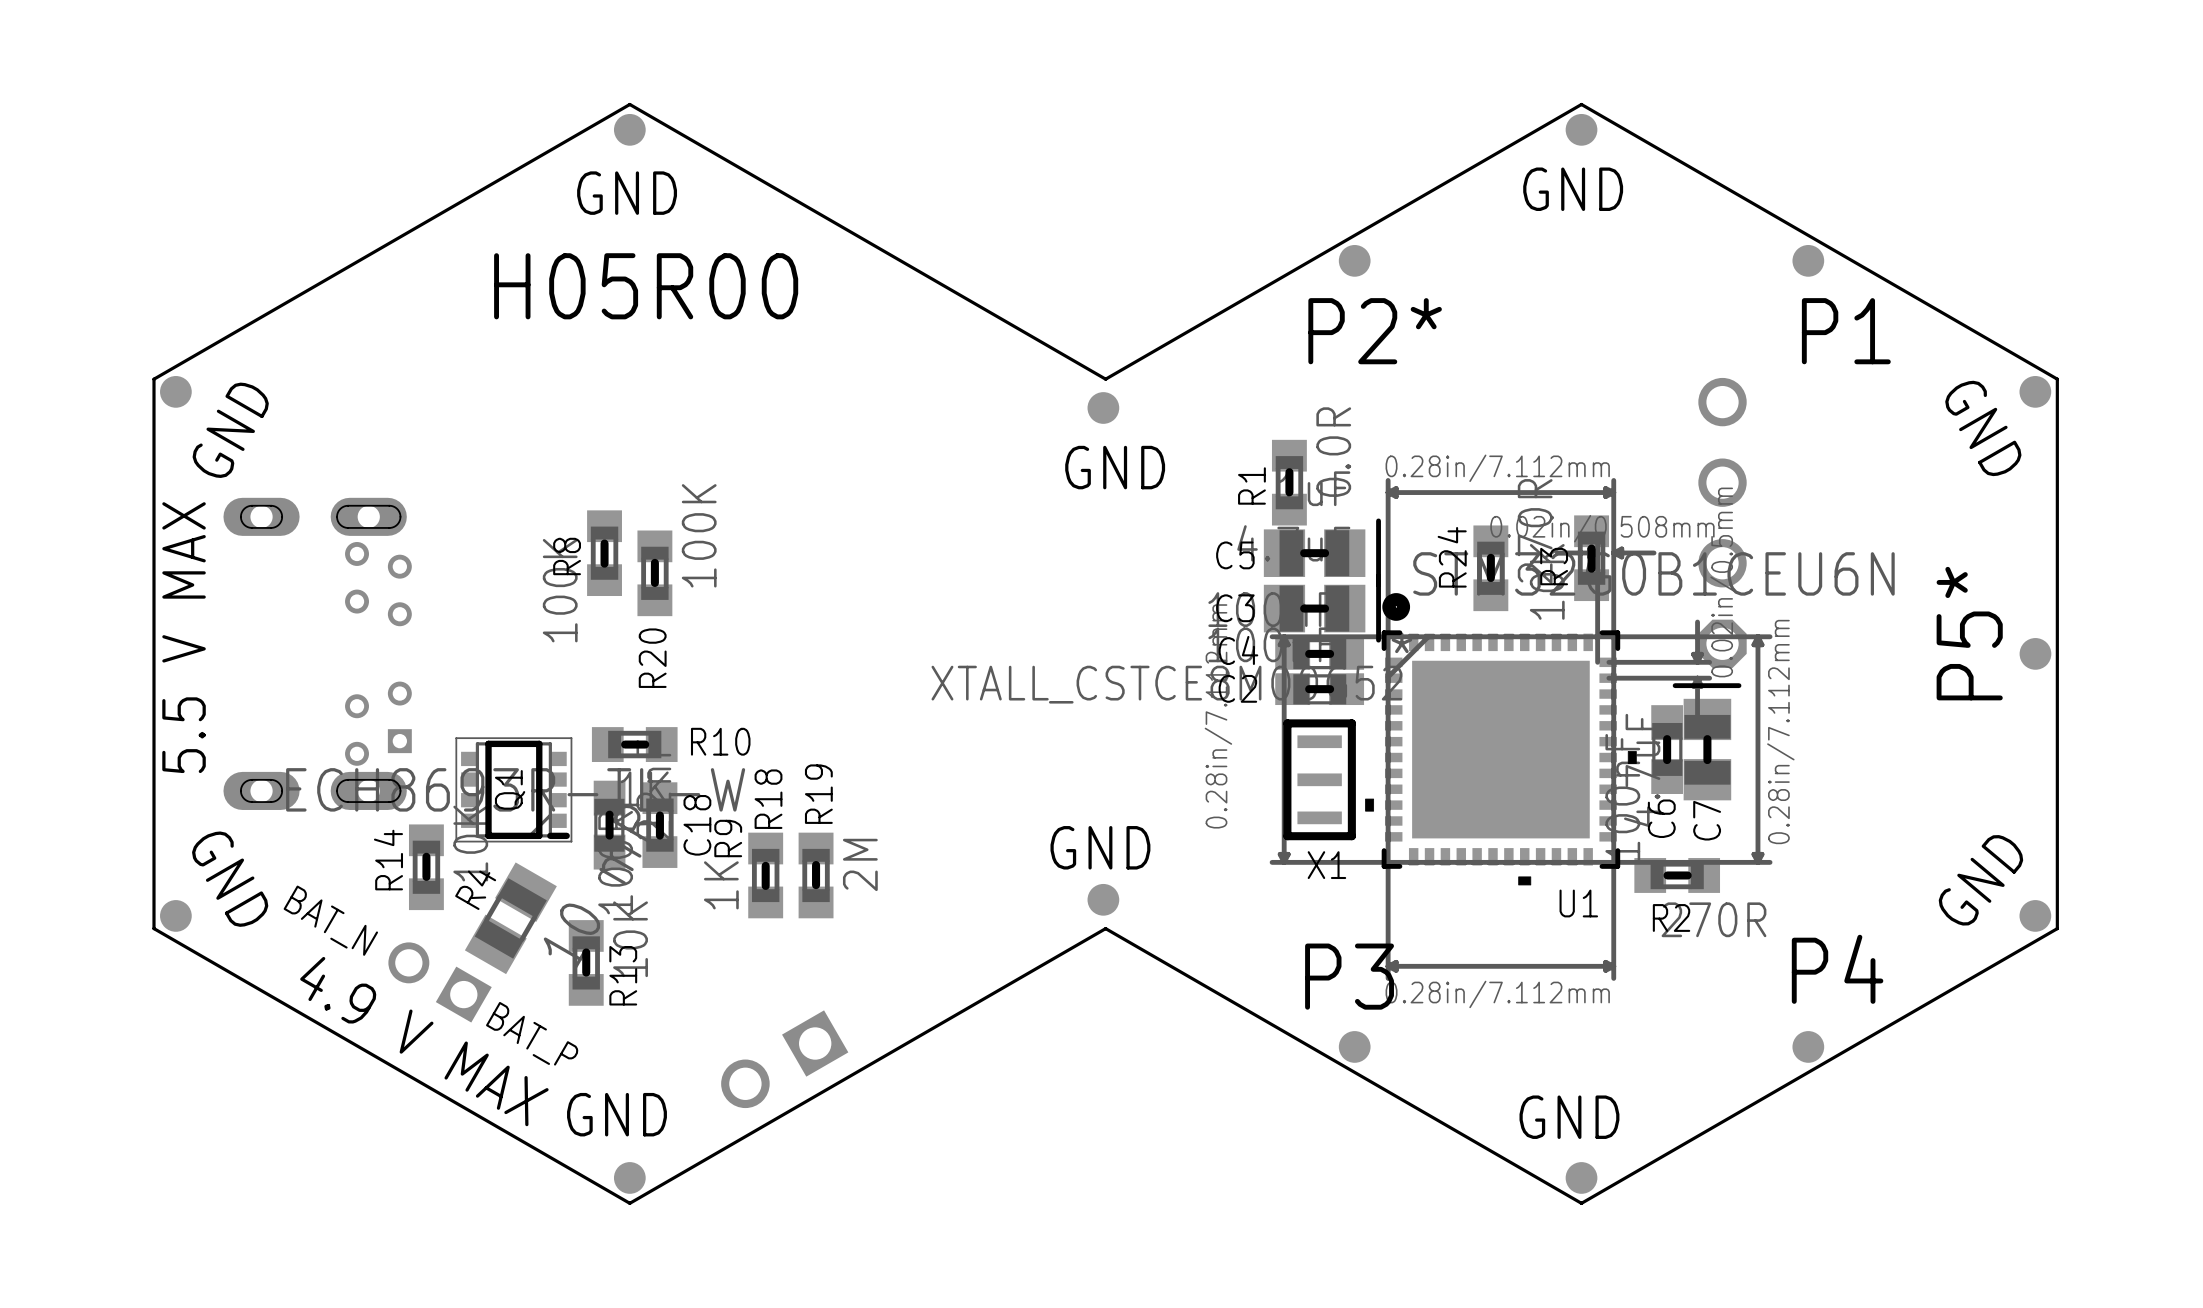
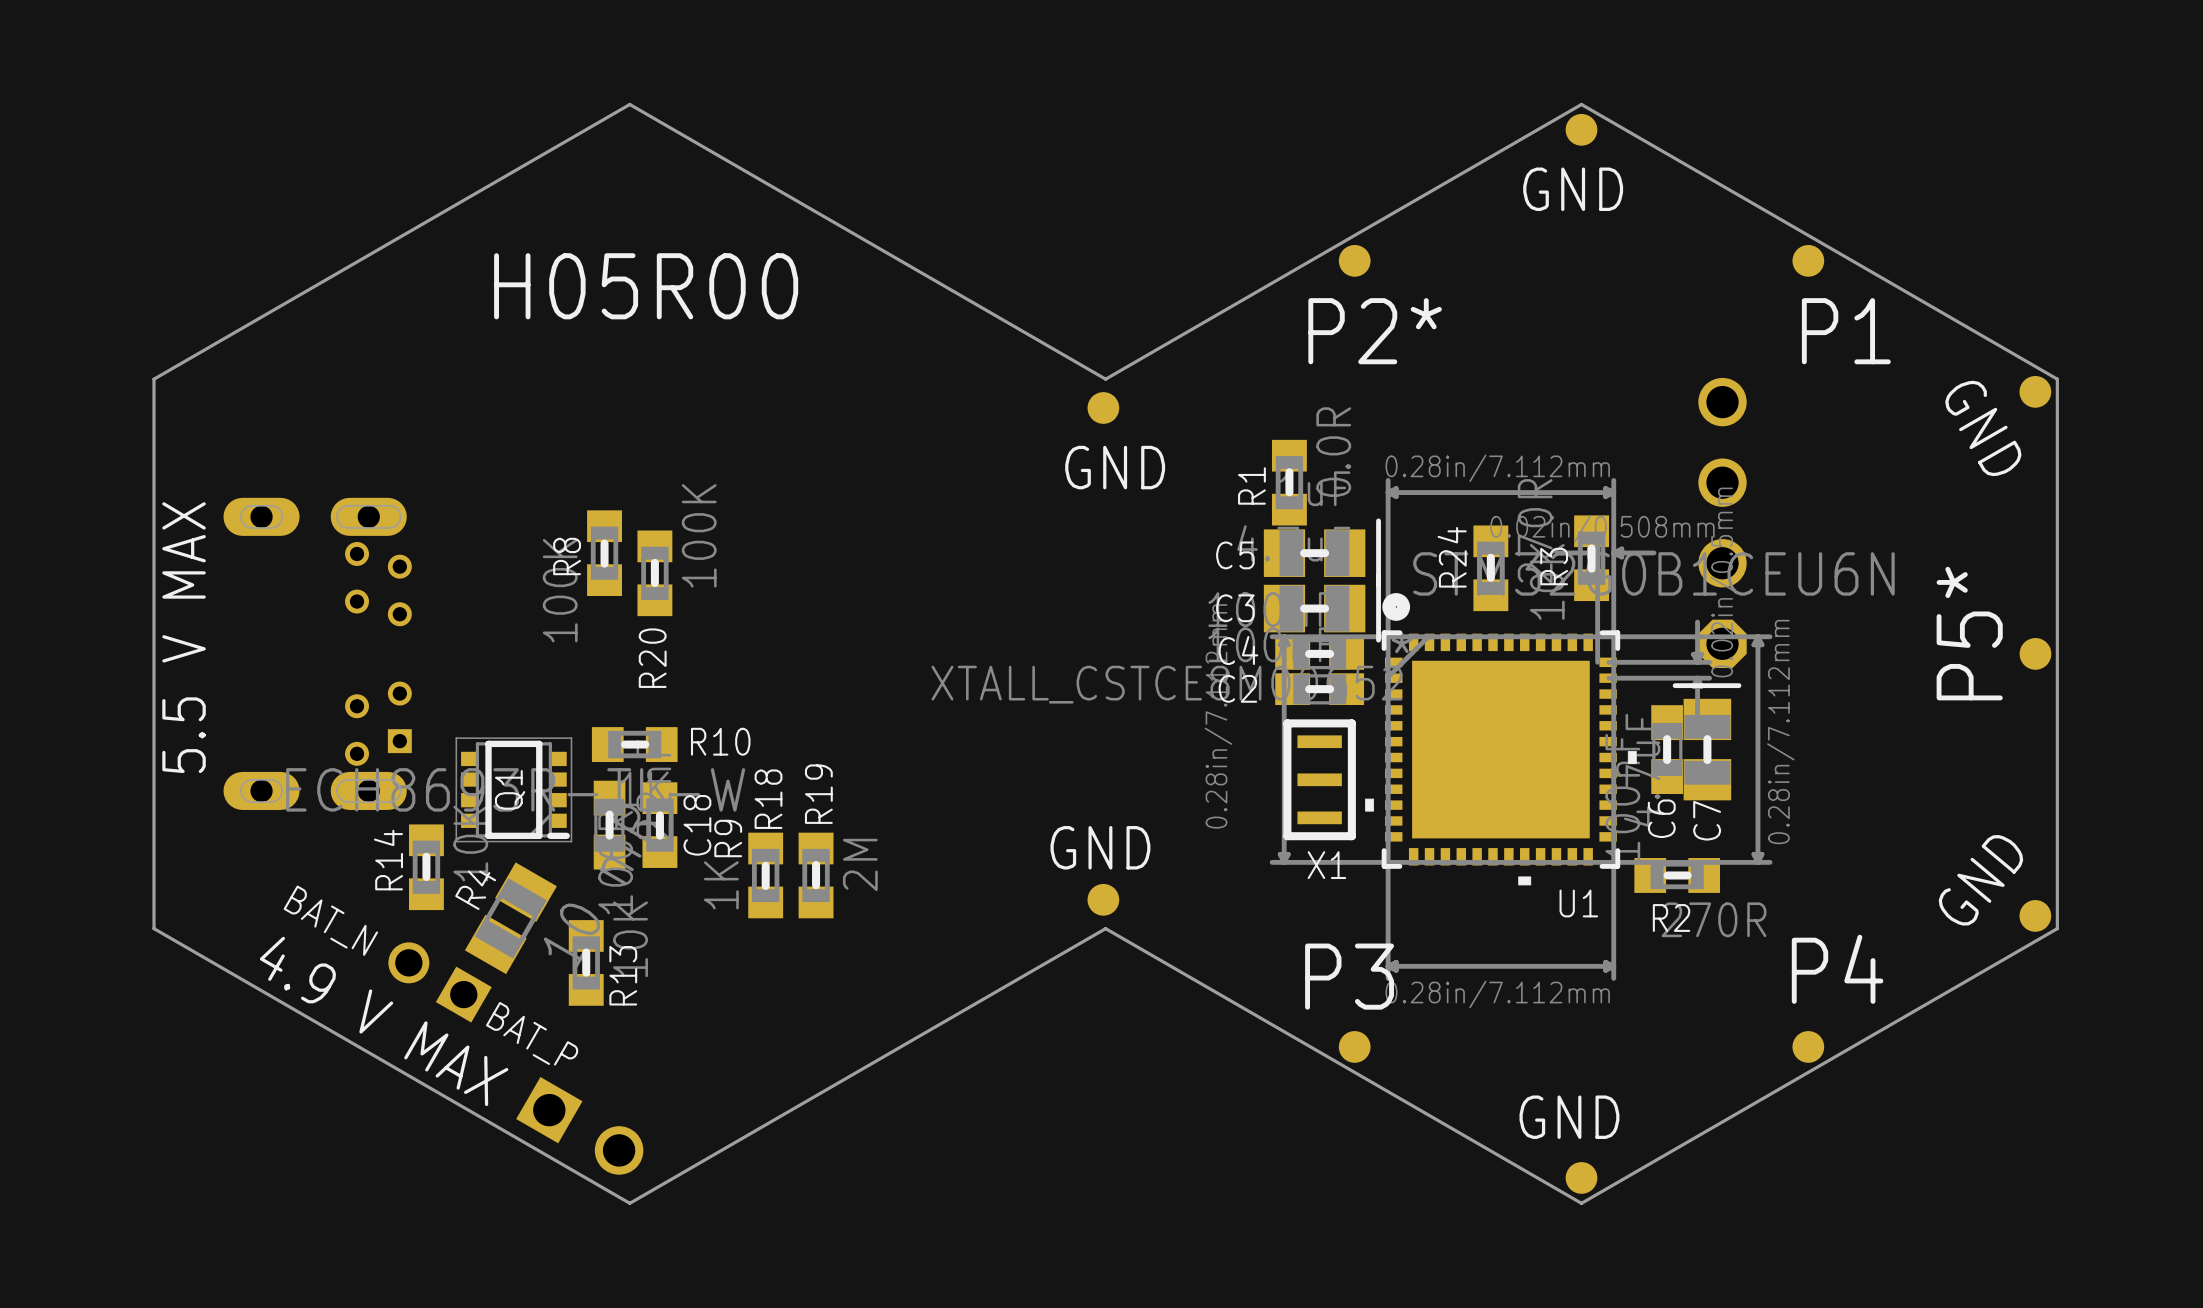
part footprint: [152, 102, 2059, 1205] -> [152, 102, 2059, 1205]
text: GND (627, 193) -> none
text: GND (230, 430) -> none
text: GND (230, 879) -> none
text position: 4.9 V MAX (424, 1041) -> 4.9 V MAX (384, 1021)
part: (784, 1059) -> none
text: GND (616, 1114) -> none
part: none -> (579, 1125)

